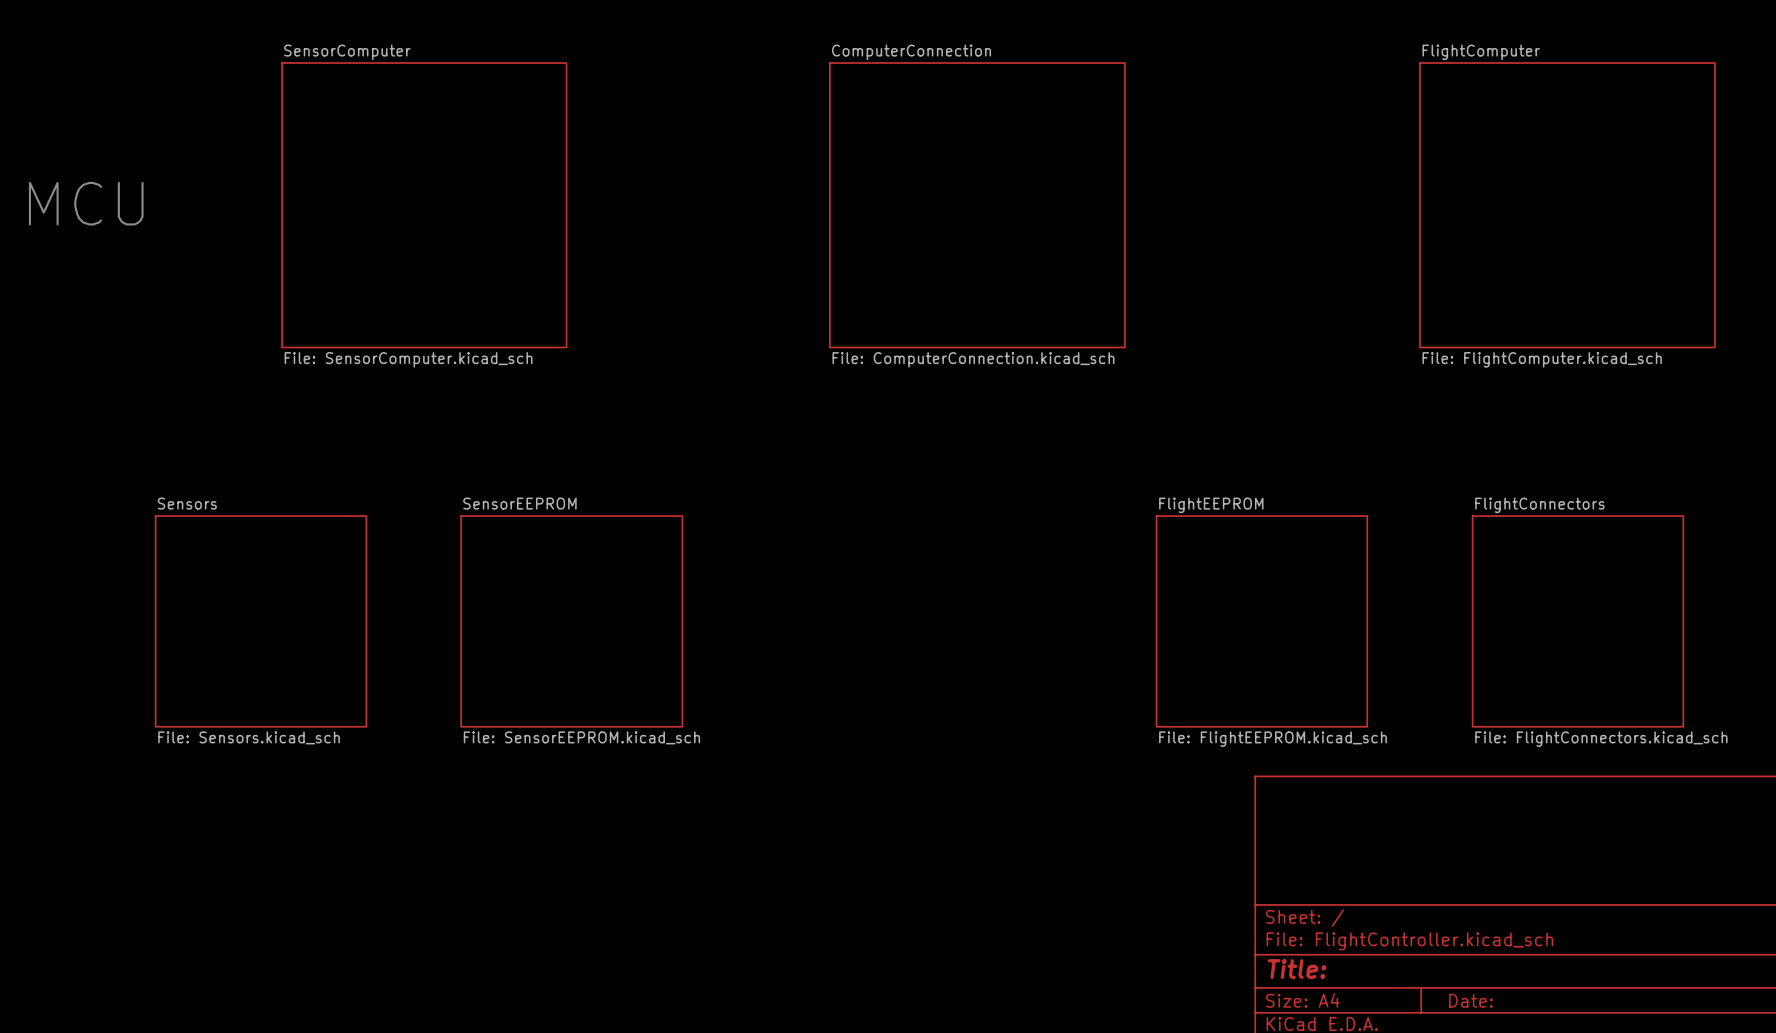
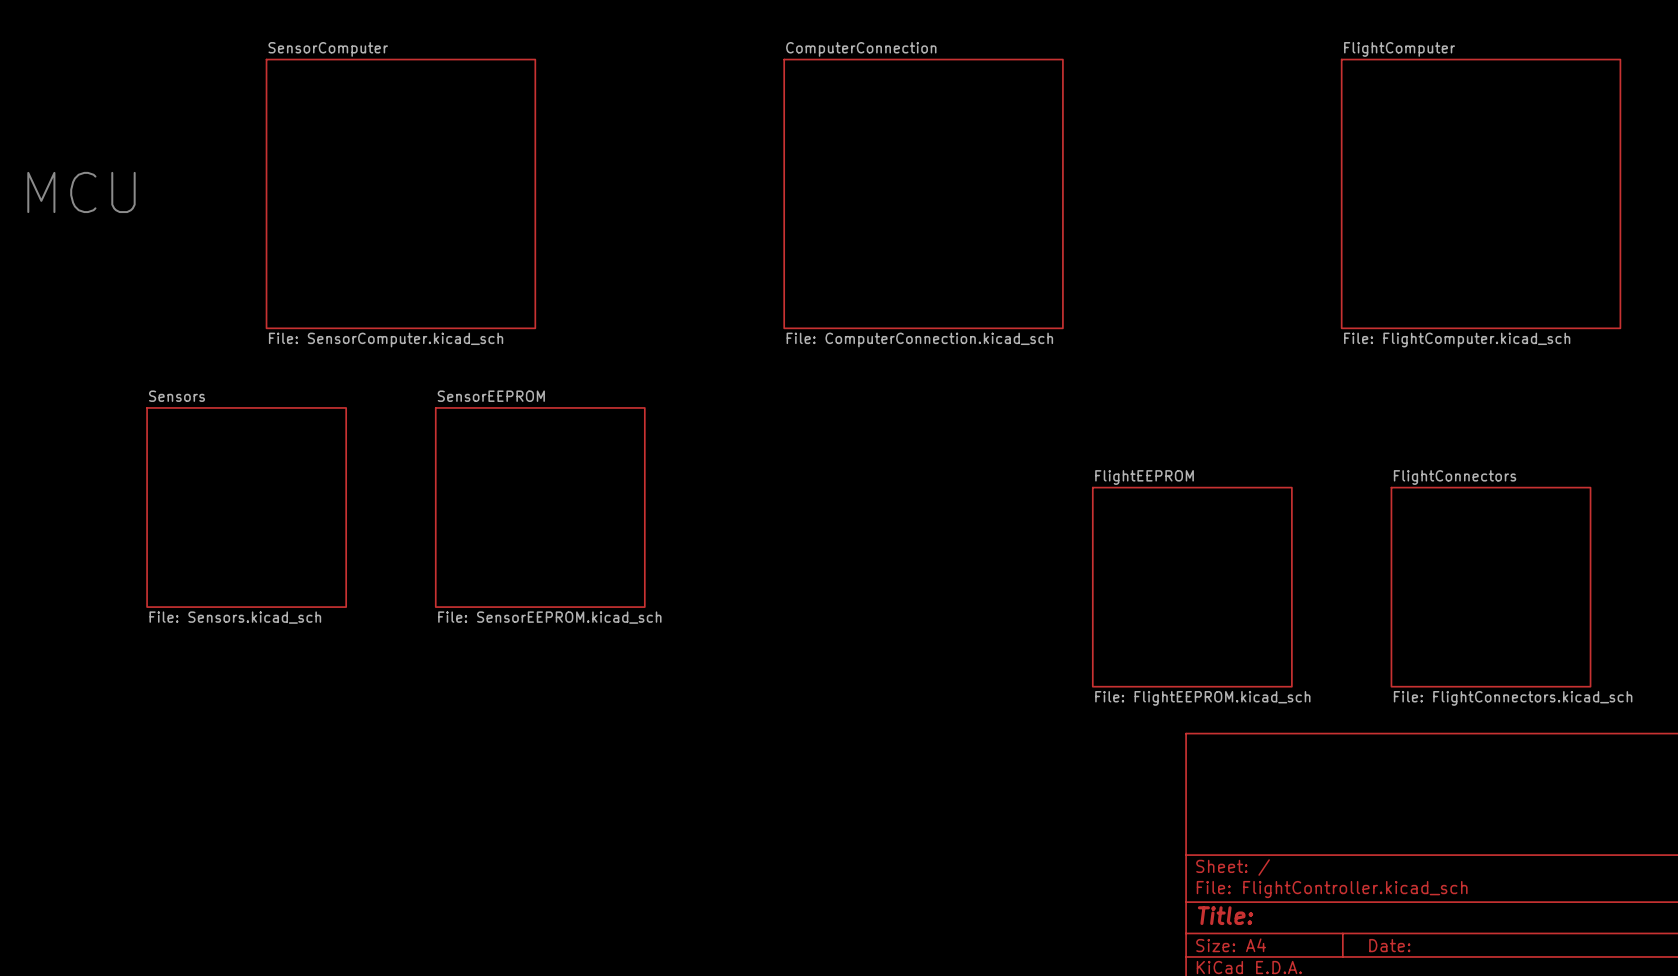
sheet Sensors position: (261, 621) -> (246, 507)
sheet SensorEEPROM position: (571, 621) -> (540, 507)

